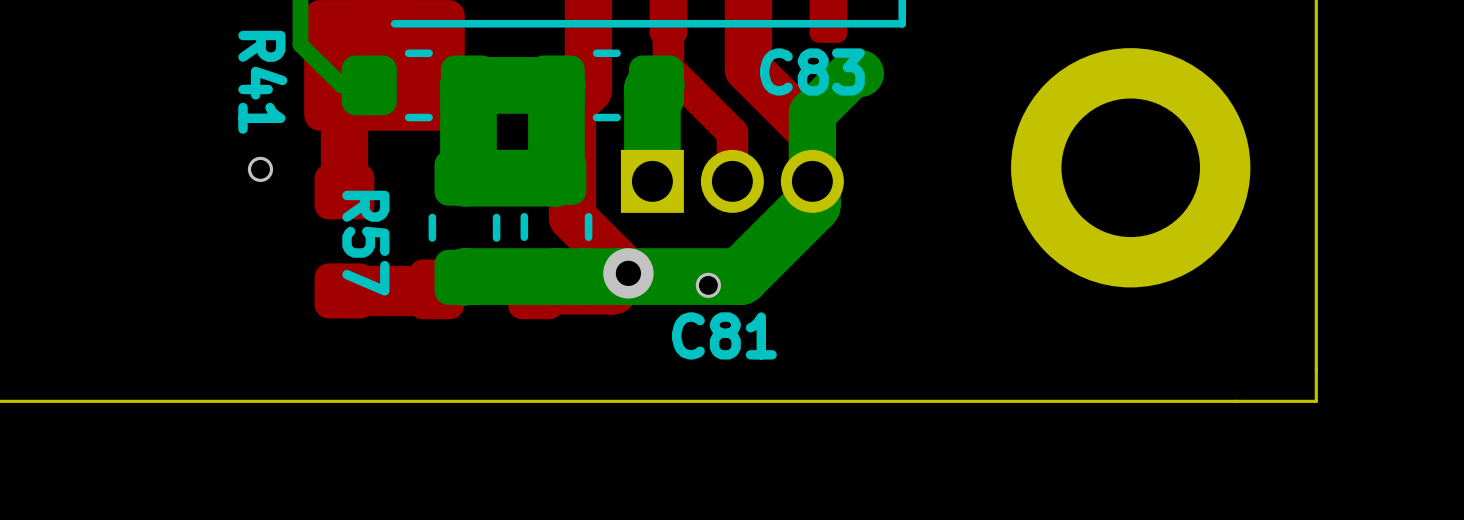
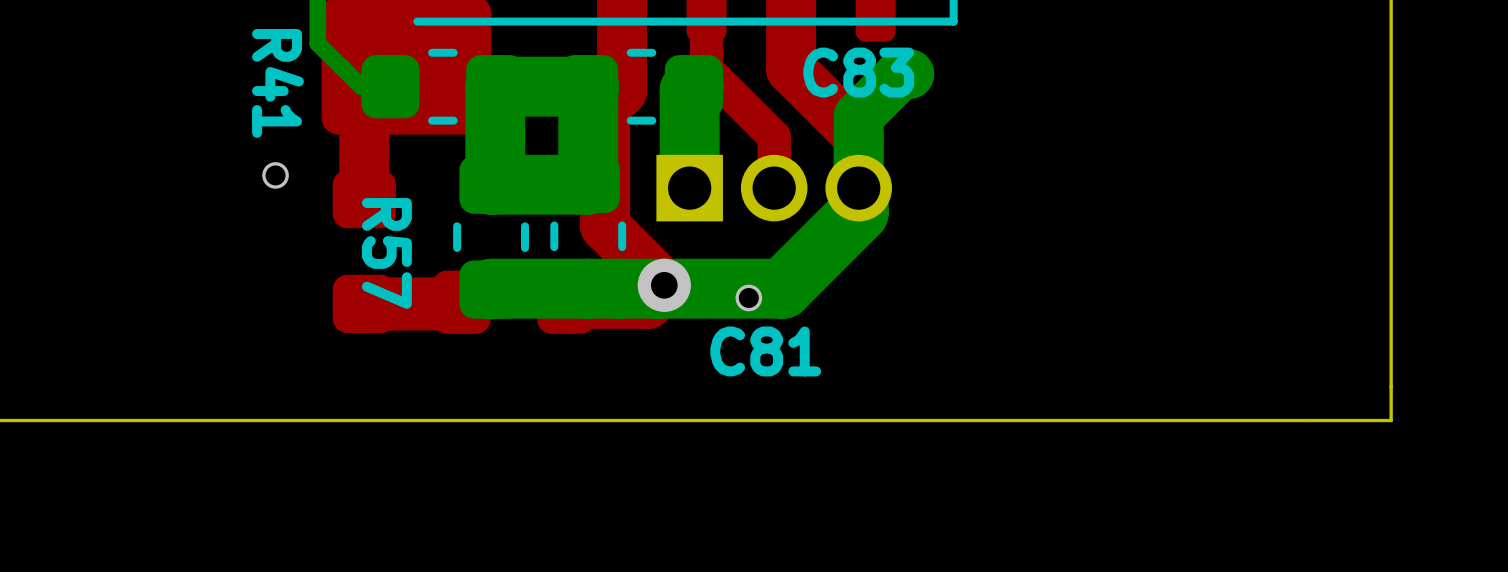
part: (1130, 167) -> none

